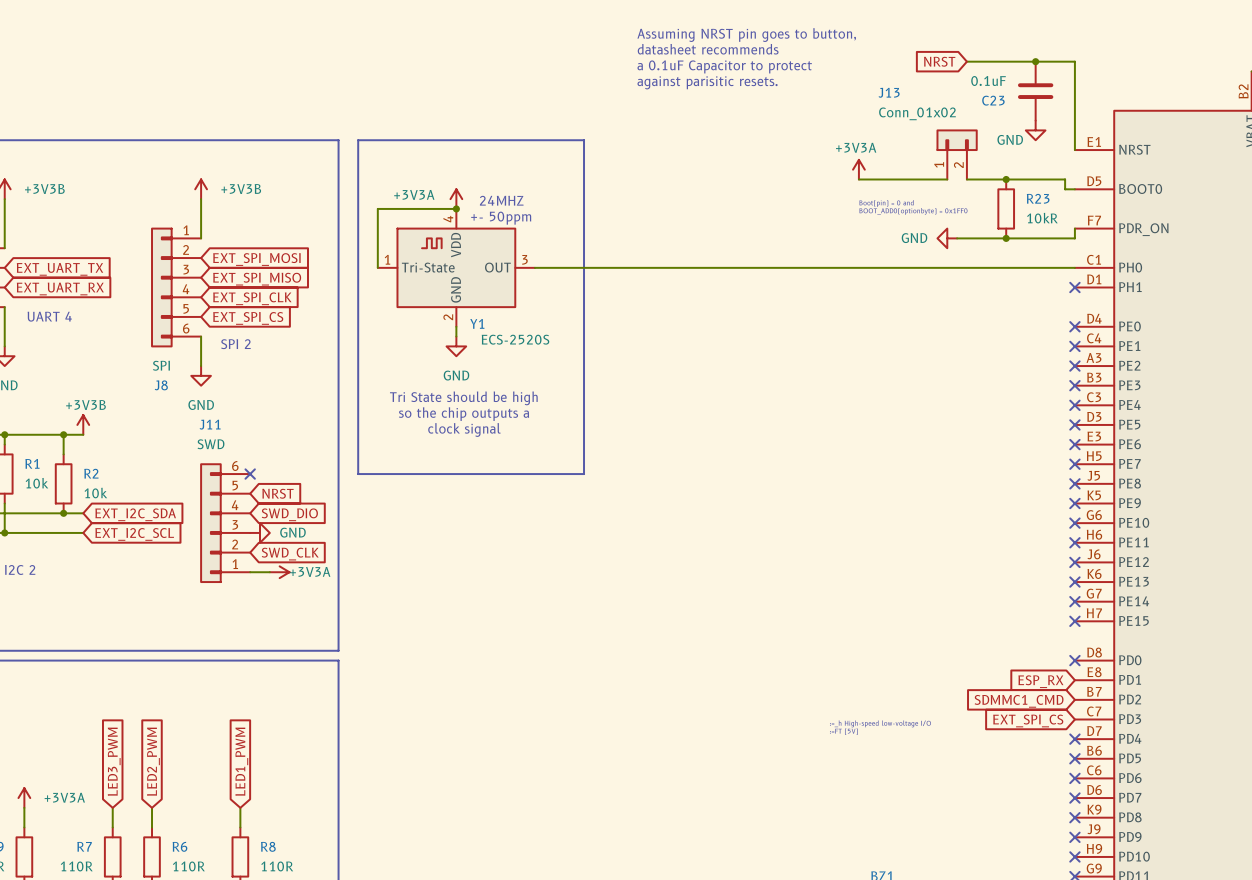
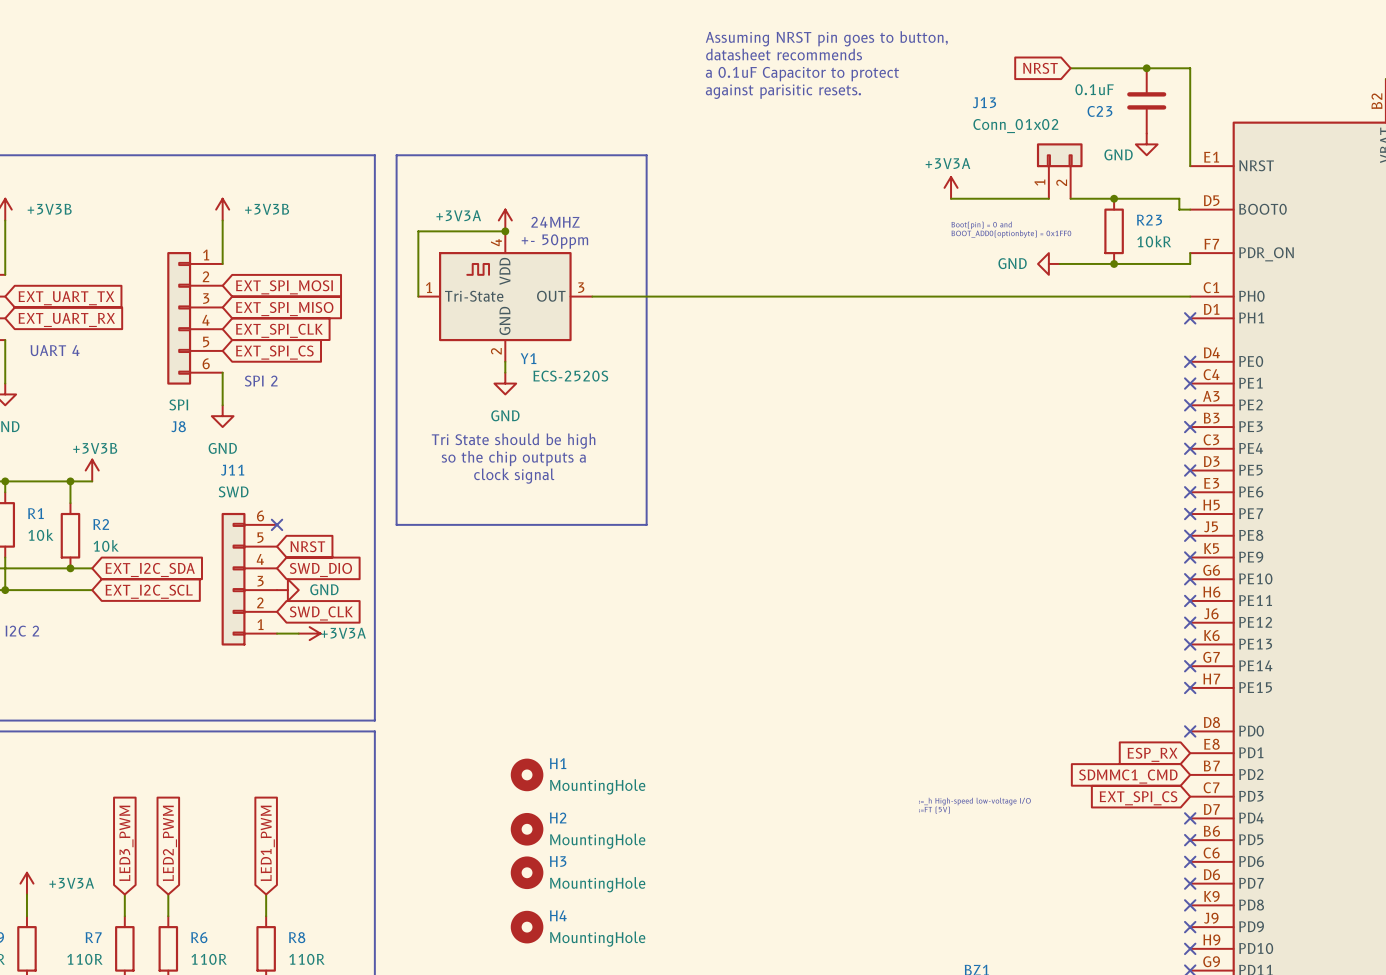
H1: none -> MountingHole (527, 774)
H2: none -> MountingHole (527, 829)
H3: none -> MountingHole (527, 872)
H4: none -> MountingHole (527, 927)

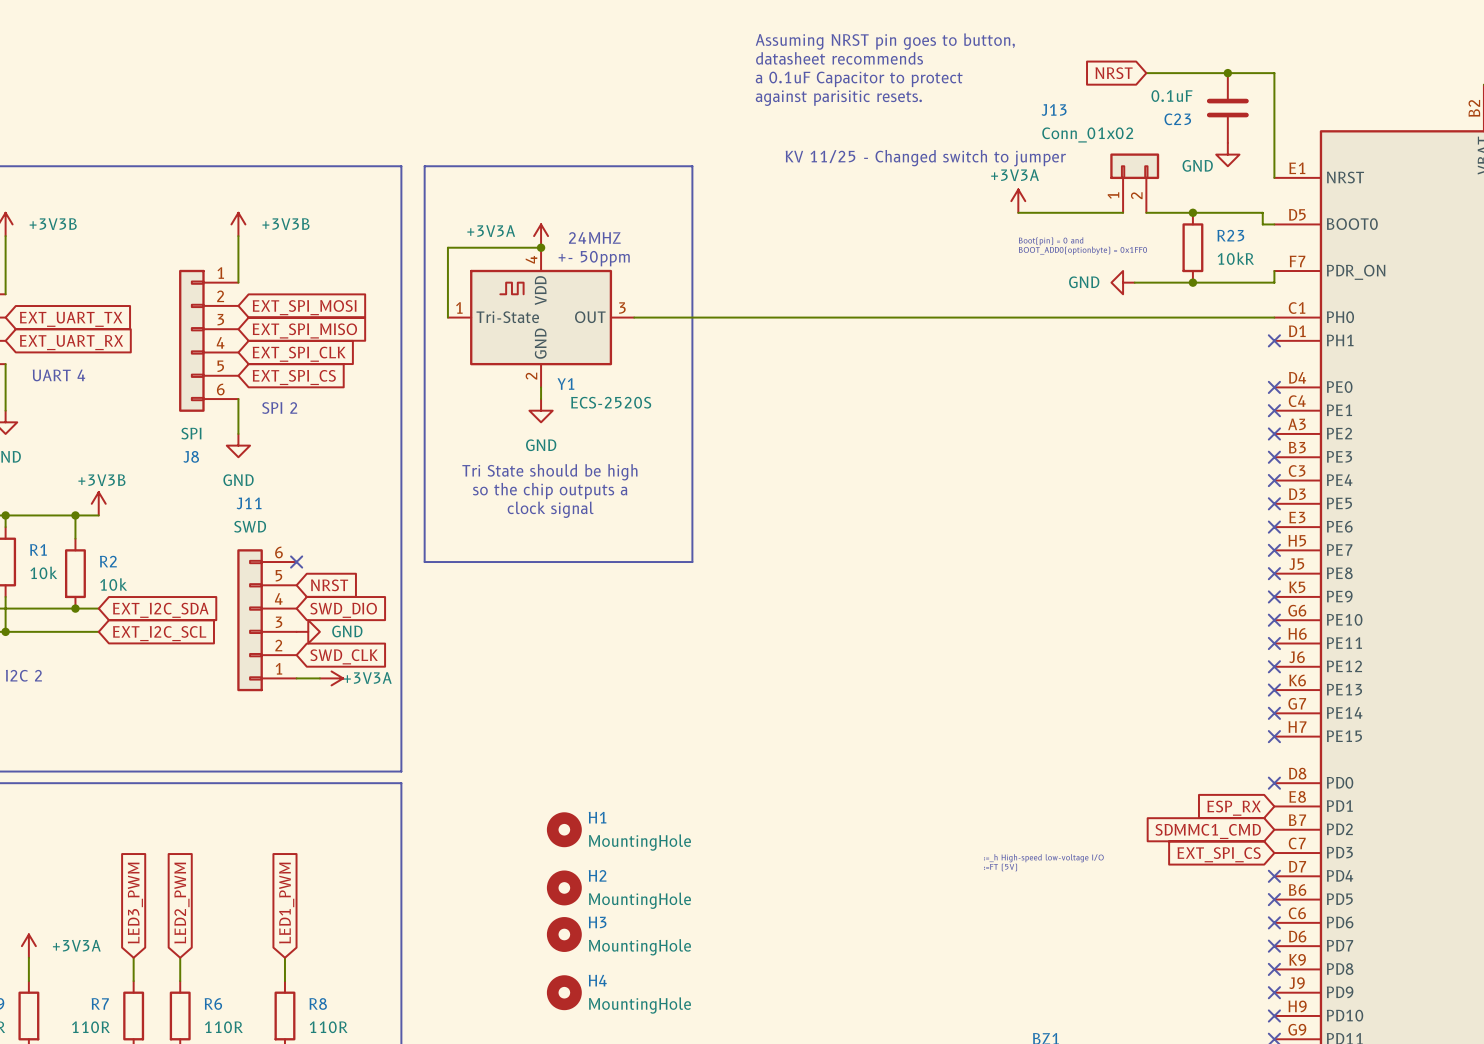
text: none -> KV 11/25 - Changed switch to jumper (925, 158)

